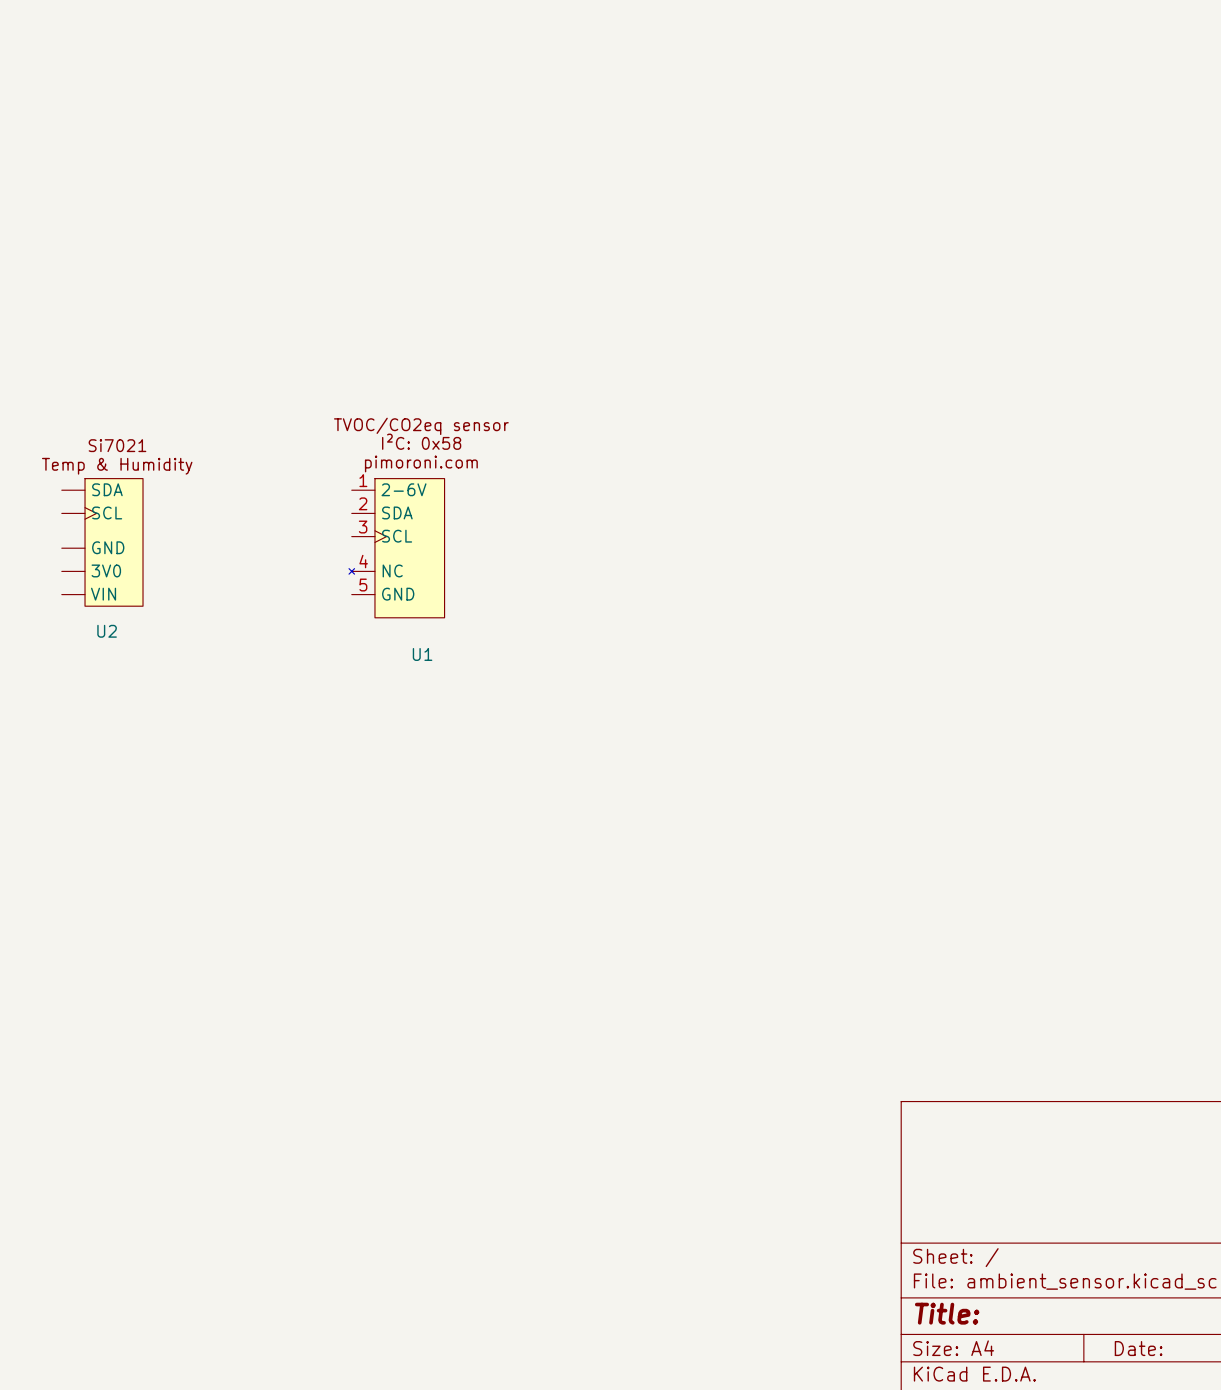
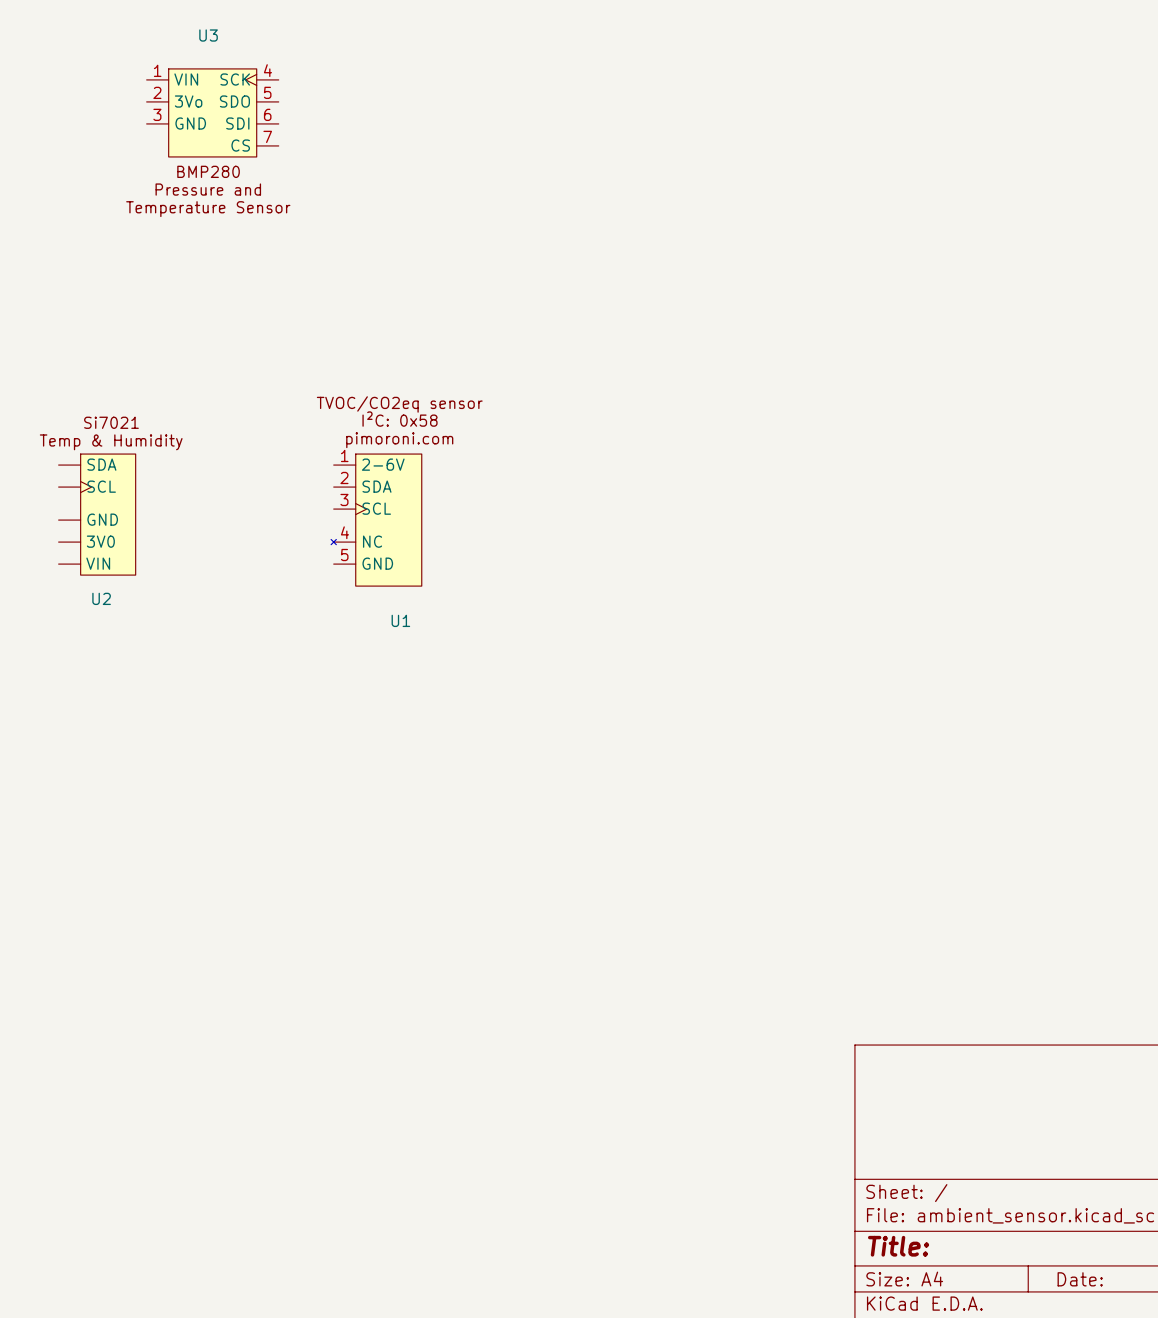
U3: none -> (212, 112)

